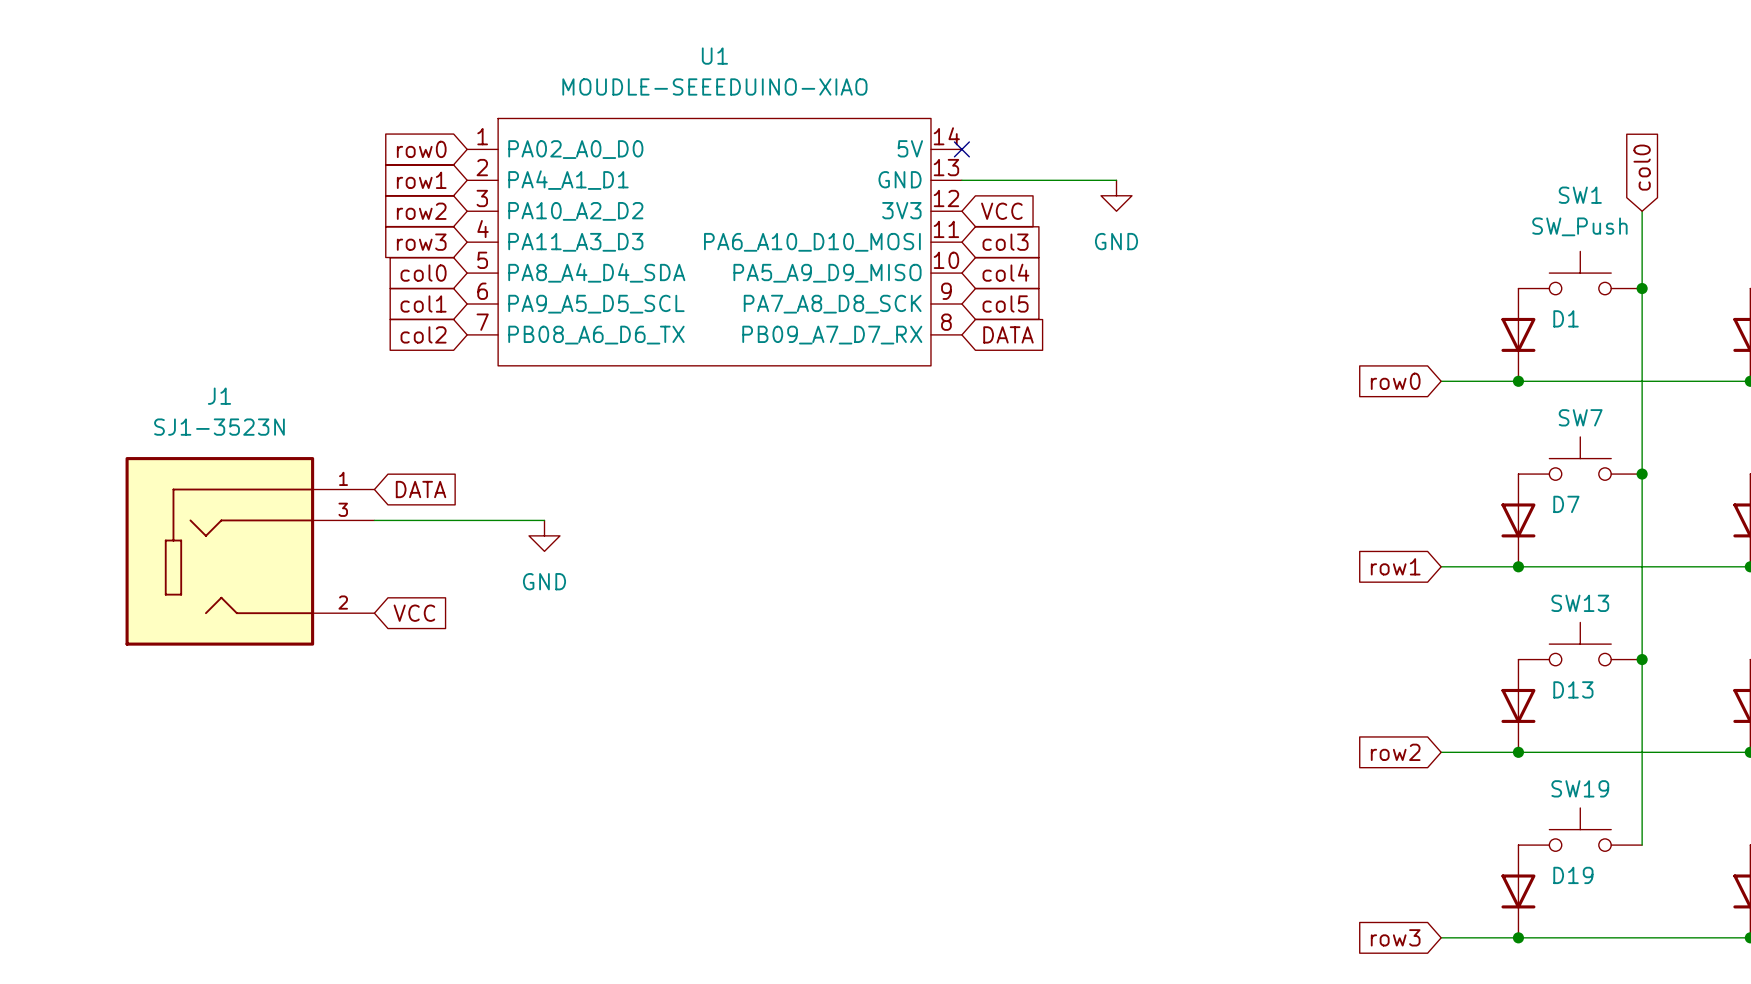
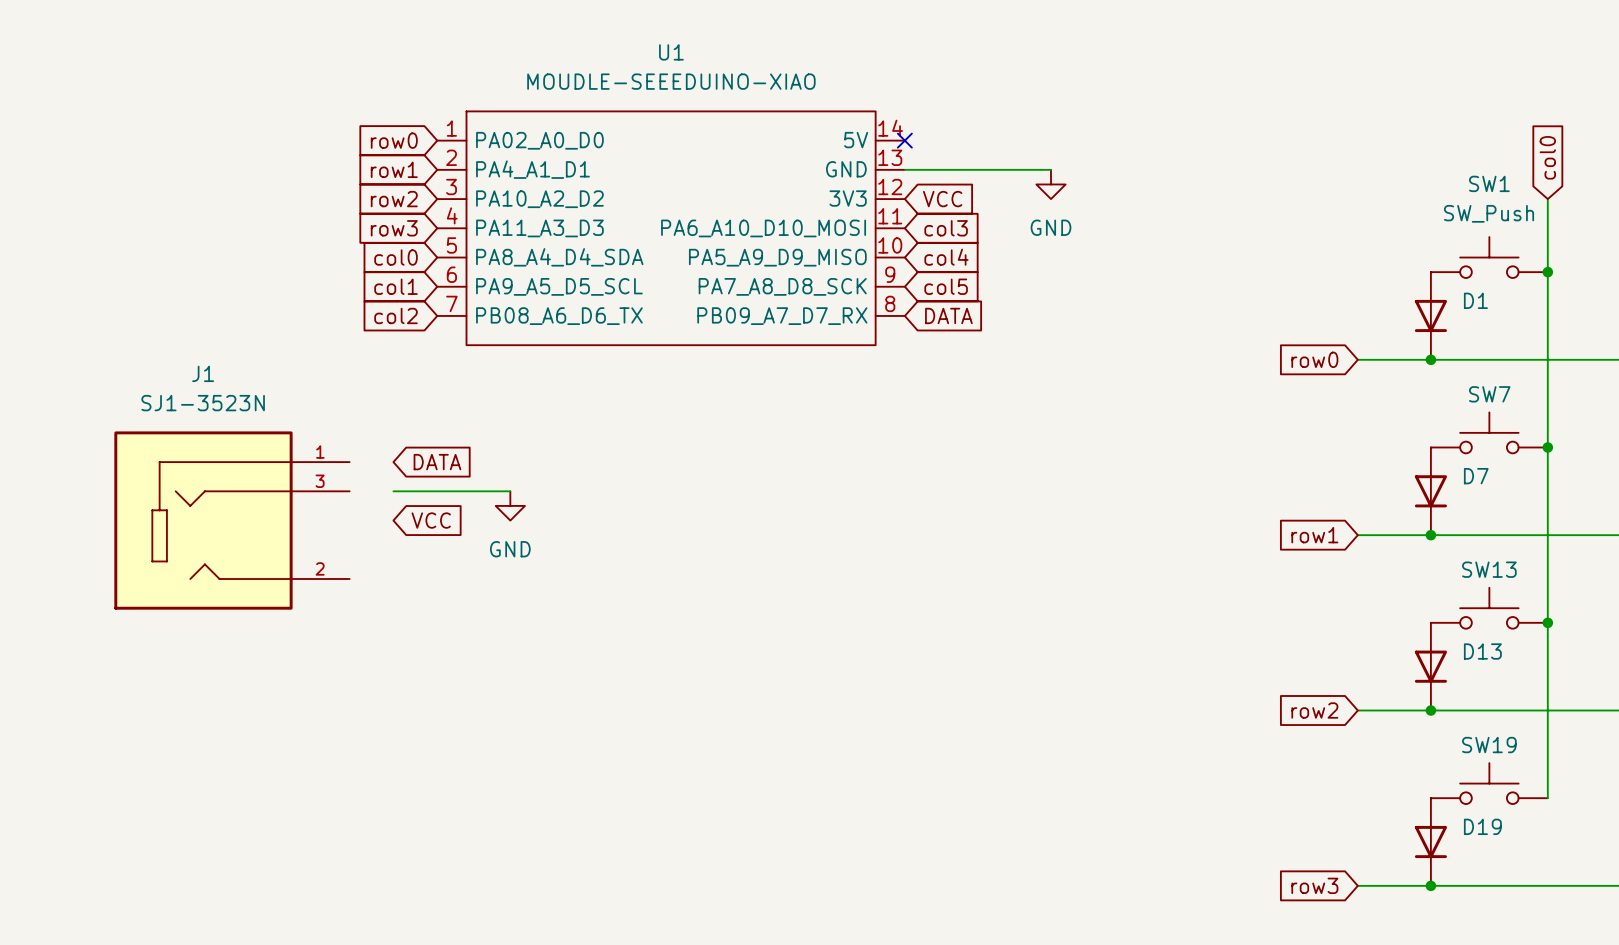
global label position: DATA (421, 489) -> DATA (437, 462)
wire: (374, 520) (420, 520) -> none
global label position: VCC (414, 613) -> VCC (431, 520)

